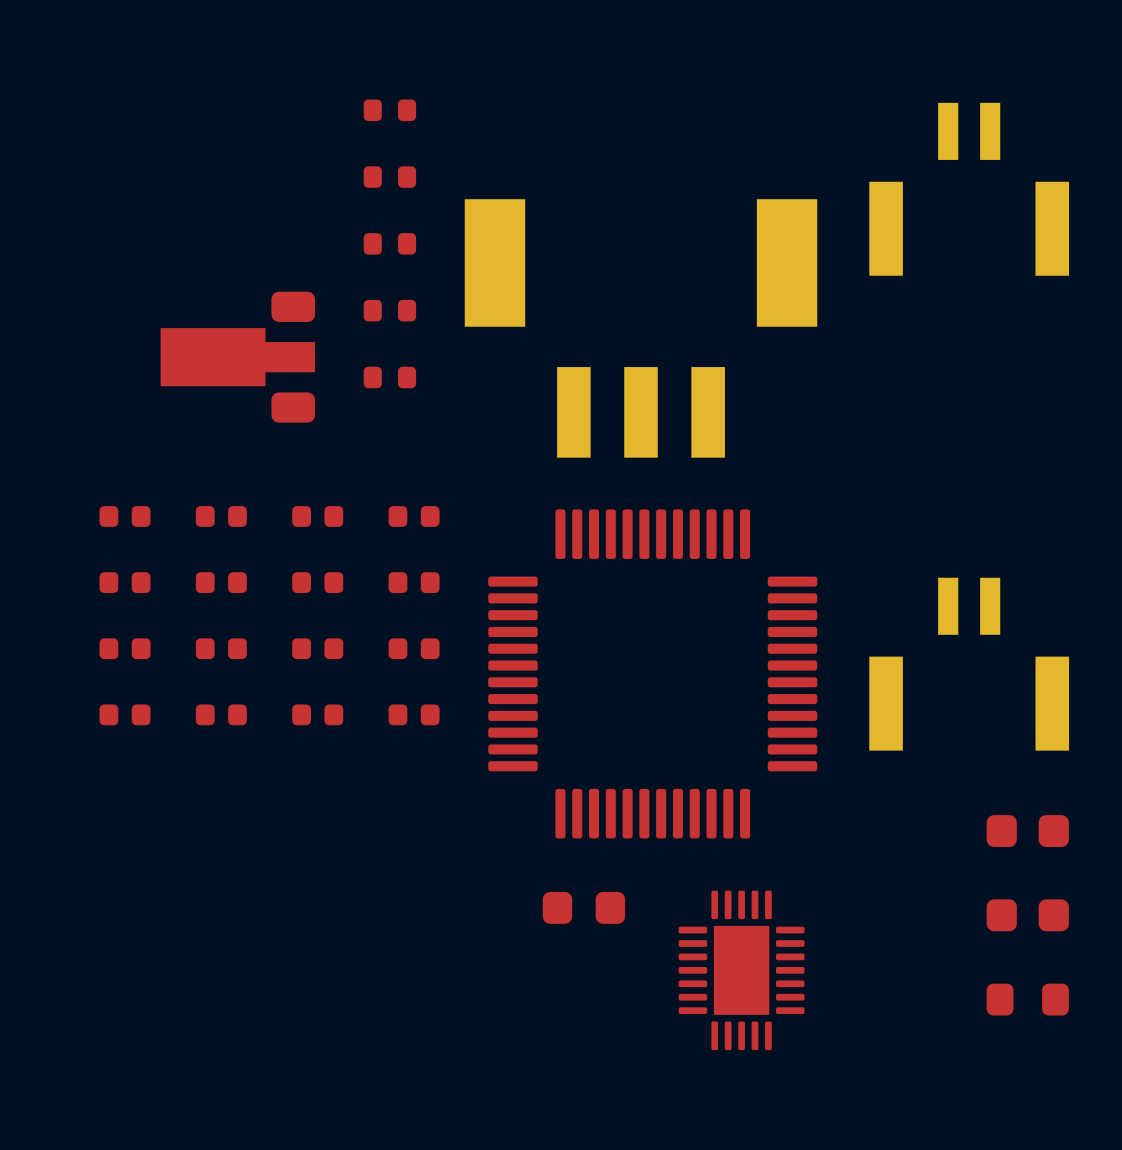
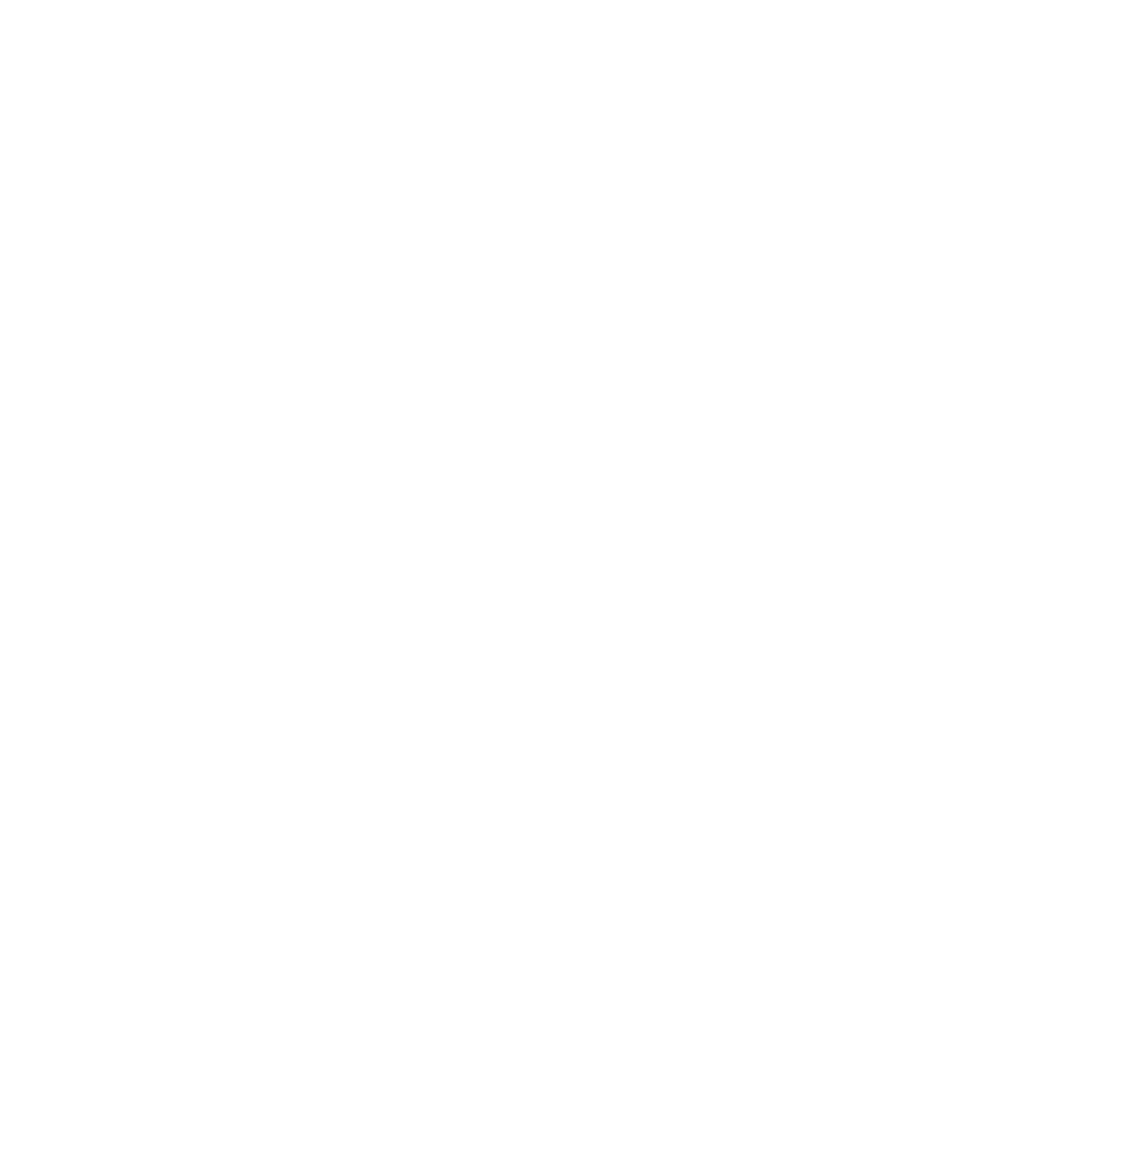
part: (389, 110) -> none
part: (389, 177) -> none
part: (969, 189) -> none
part: (389, 243) -> none
part: (389, 310) -> none
part: (641, 328) -> none
part: (237, 357) -> none
part: (389, 377) -> none
part: (125, 516) -> none
part: (221, 516) -> none
part: (317, 516) -> none
part: (414, 516) -> none
part: (125, 582) -> none
part: (221, 582) -> none
part: (317, 582) -> none
part: (414, 582) -> none
part: (125, 648) -> none
part: (221, 648) -> none
part: (317, 648) -> none
part: (414, 648) -> none
part: (969, 664) -> none
part: (652, 673) -> none
part: (125, 714) -> none
part: (221, 714) -> none
part: (317, 714) -> none
part: (414, 714) -> none
part: (1027, 831) -> none
part: (583, 907) -> none
part: (1027, 915) -> none
part: (741, 970) -> none
part: (1027, 999) -> none

